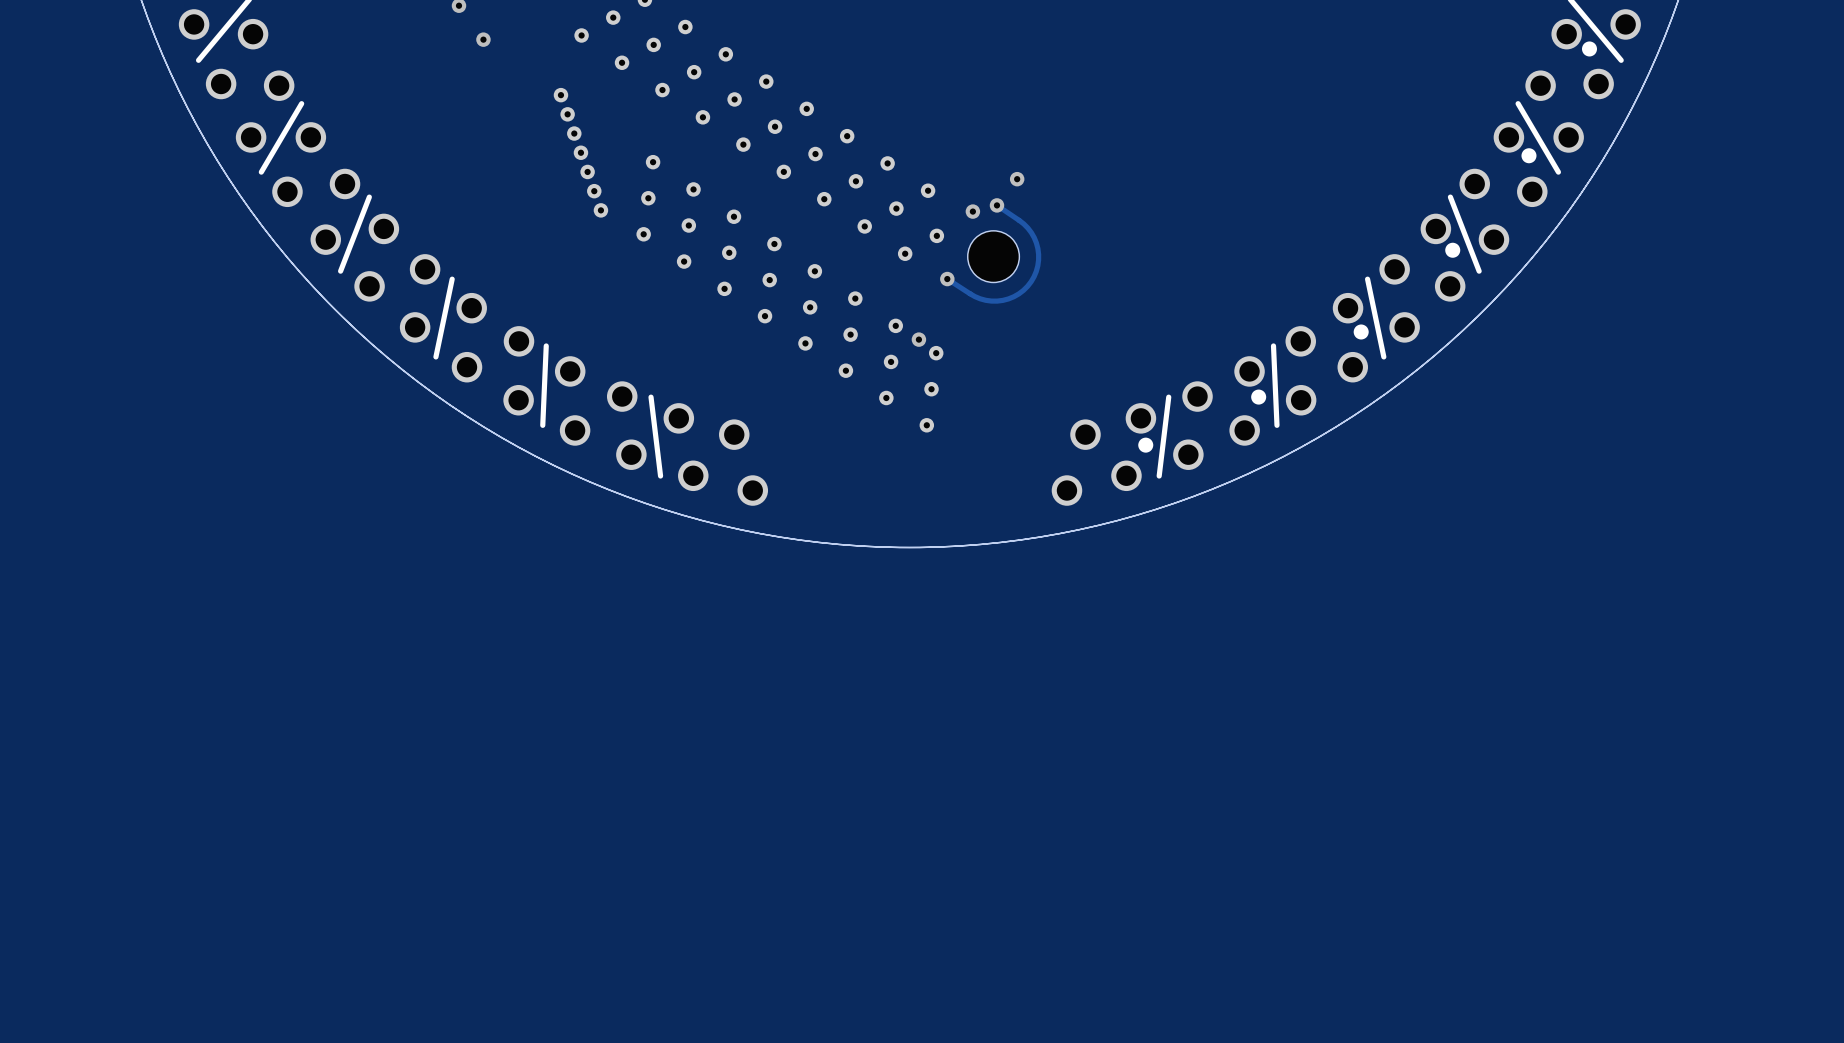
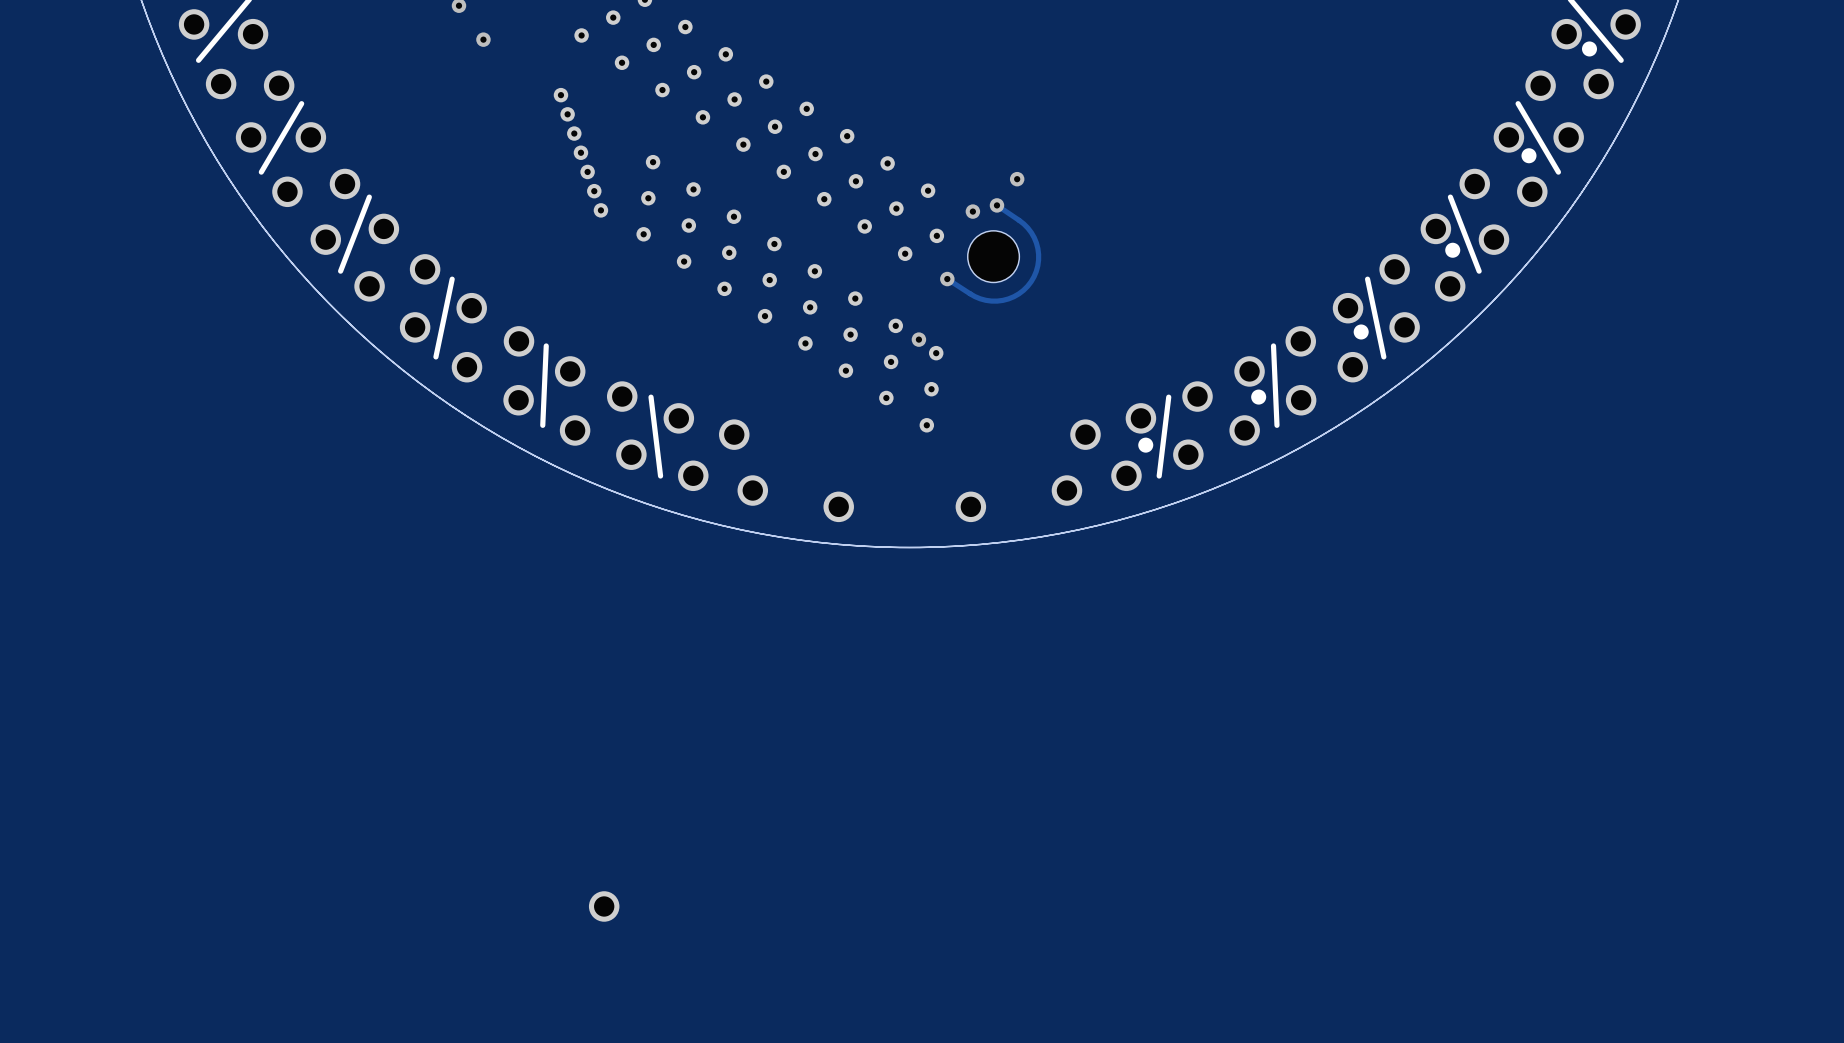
part: none -> (838, 506)
part: none -> (970, 506)
part: none -> (604, 906)

